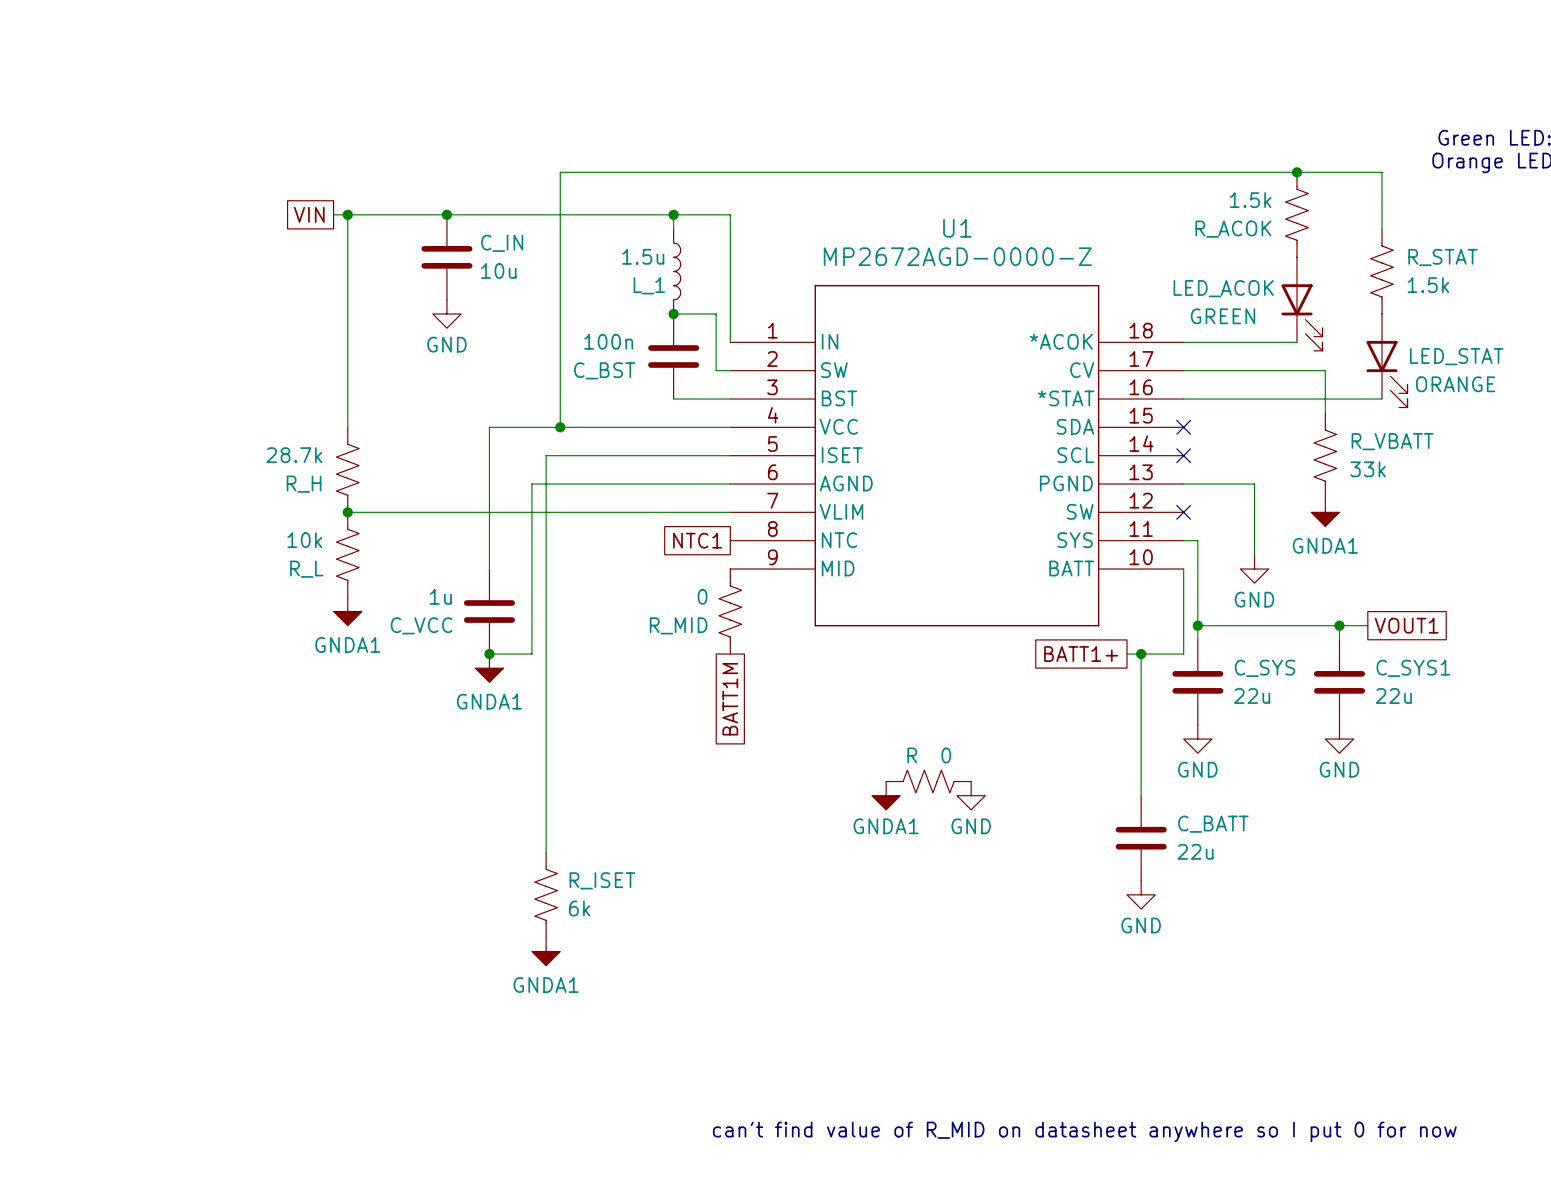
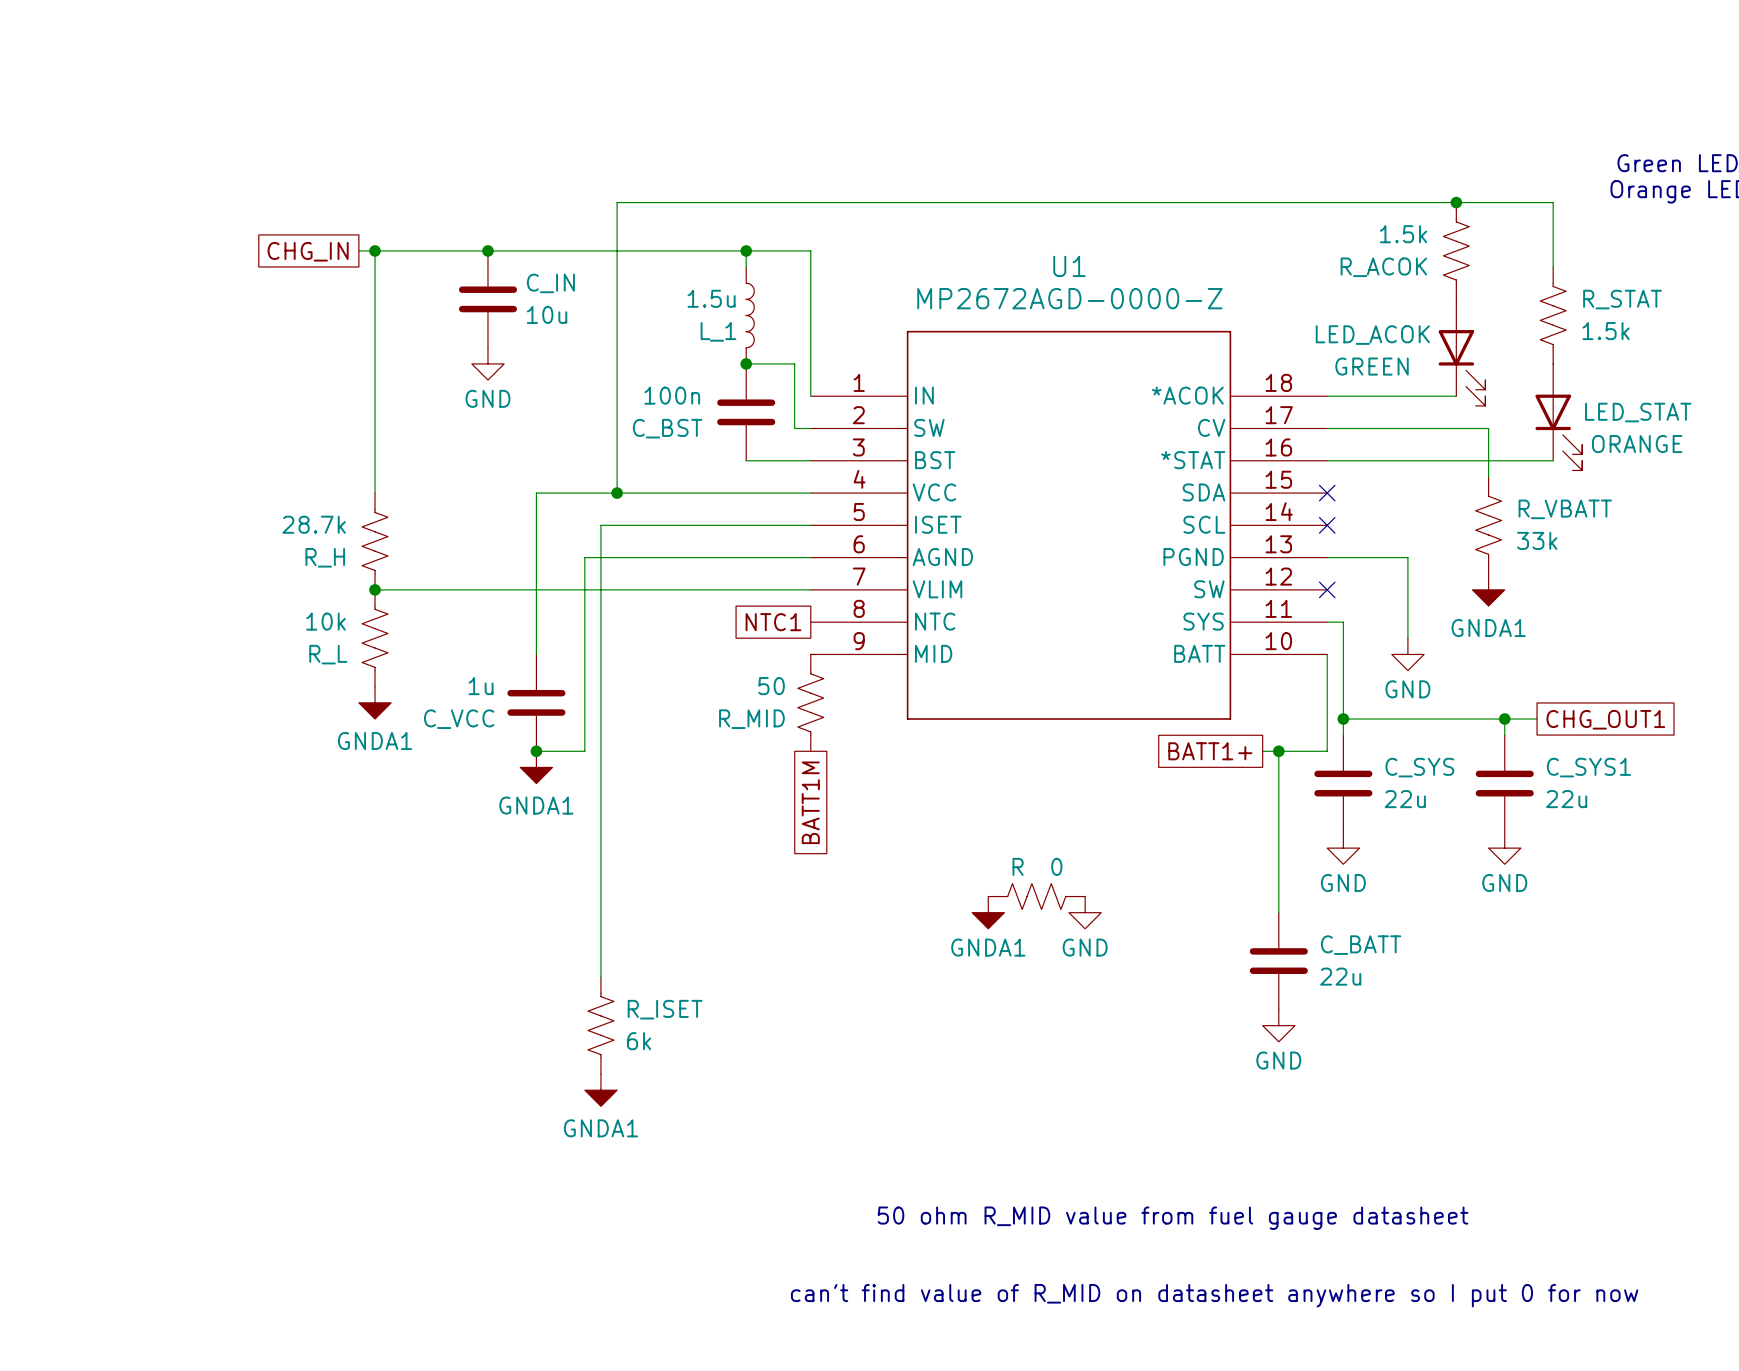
global label: VIN (309, 214) -> CHG_IN (308, 251)
R_MID value: 0 (702, 596) -> 50 (771, 686)
global label: VOUT1 (1406, 625) -> CHG_OUT1 (1605, 719)
text: none -> 50 ohm R_MID value from fuel gauge datasheet (1173, 1218)

